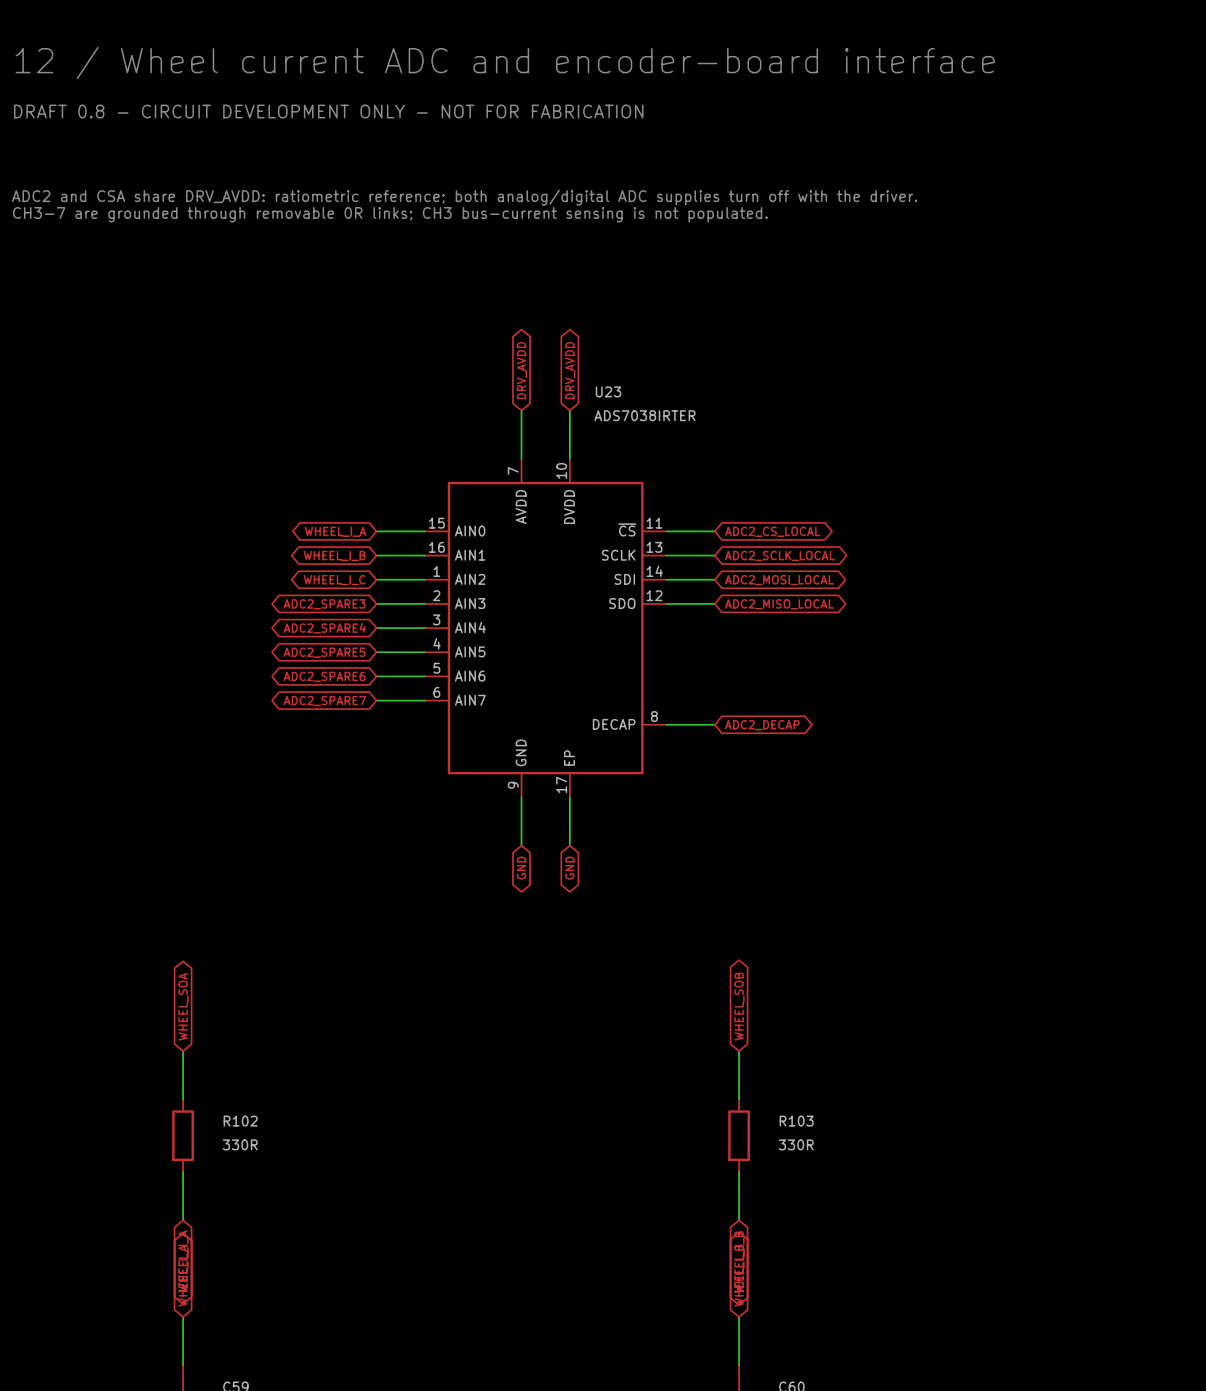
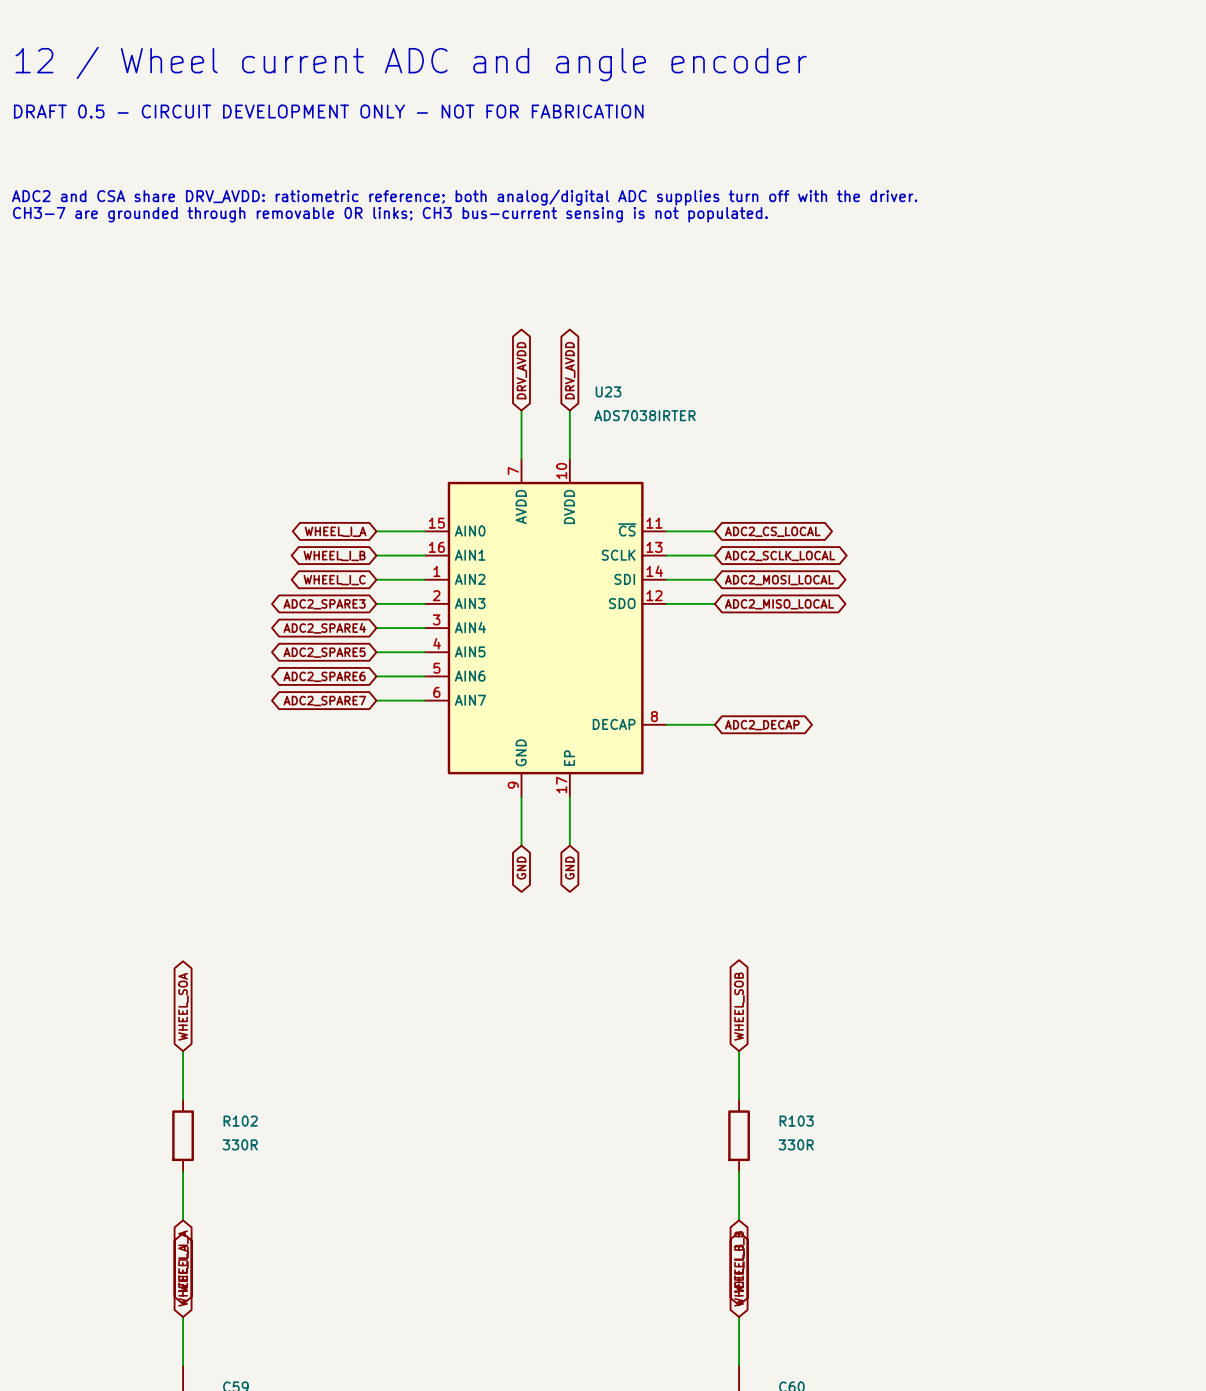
text: 12 / Wheel current ADC and encoder-board interface (505, 62) -> 12 / Wheel current ADC and angle encoder (411, 64)
text: DRAFT 0.8 - CIRCUIT DEVELOPMENT ONLY - NOT FOR FABRICATION (328, 111) -> DRAFT 0.5 - CIRCUIT DEVELOPMENT ONLY - NOT FOR FABRICATION (328, 111)

